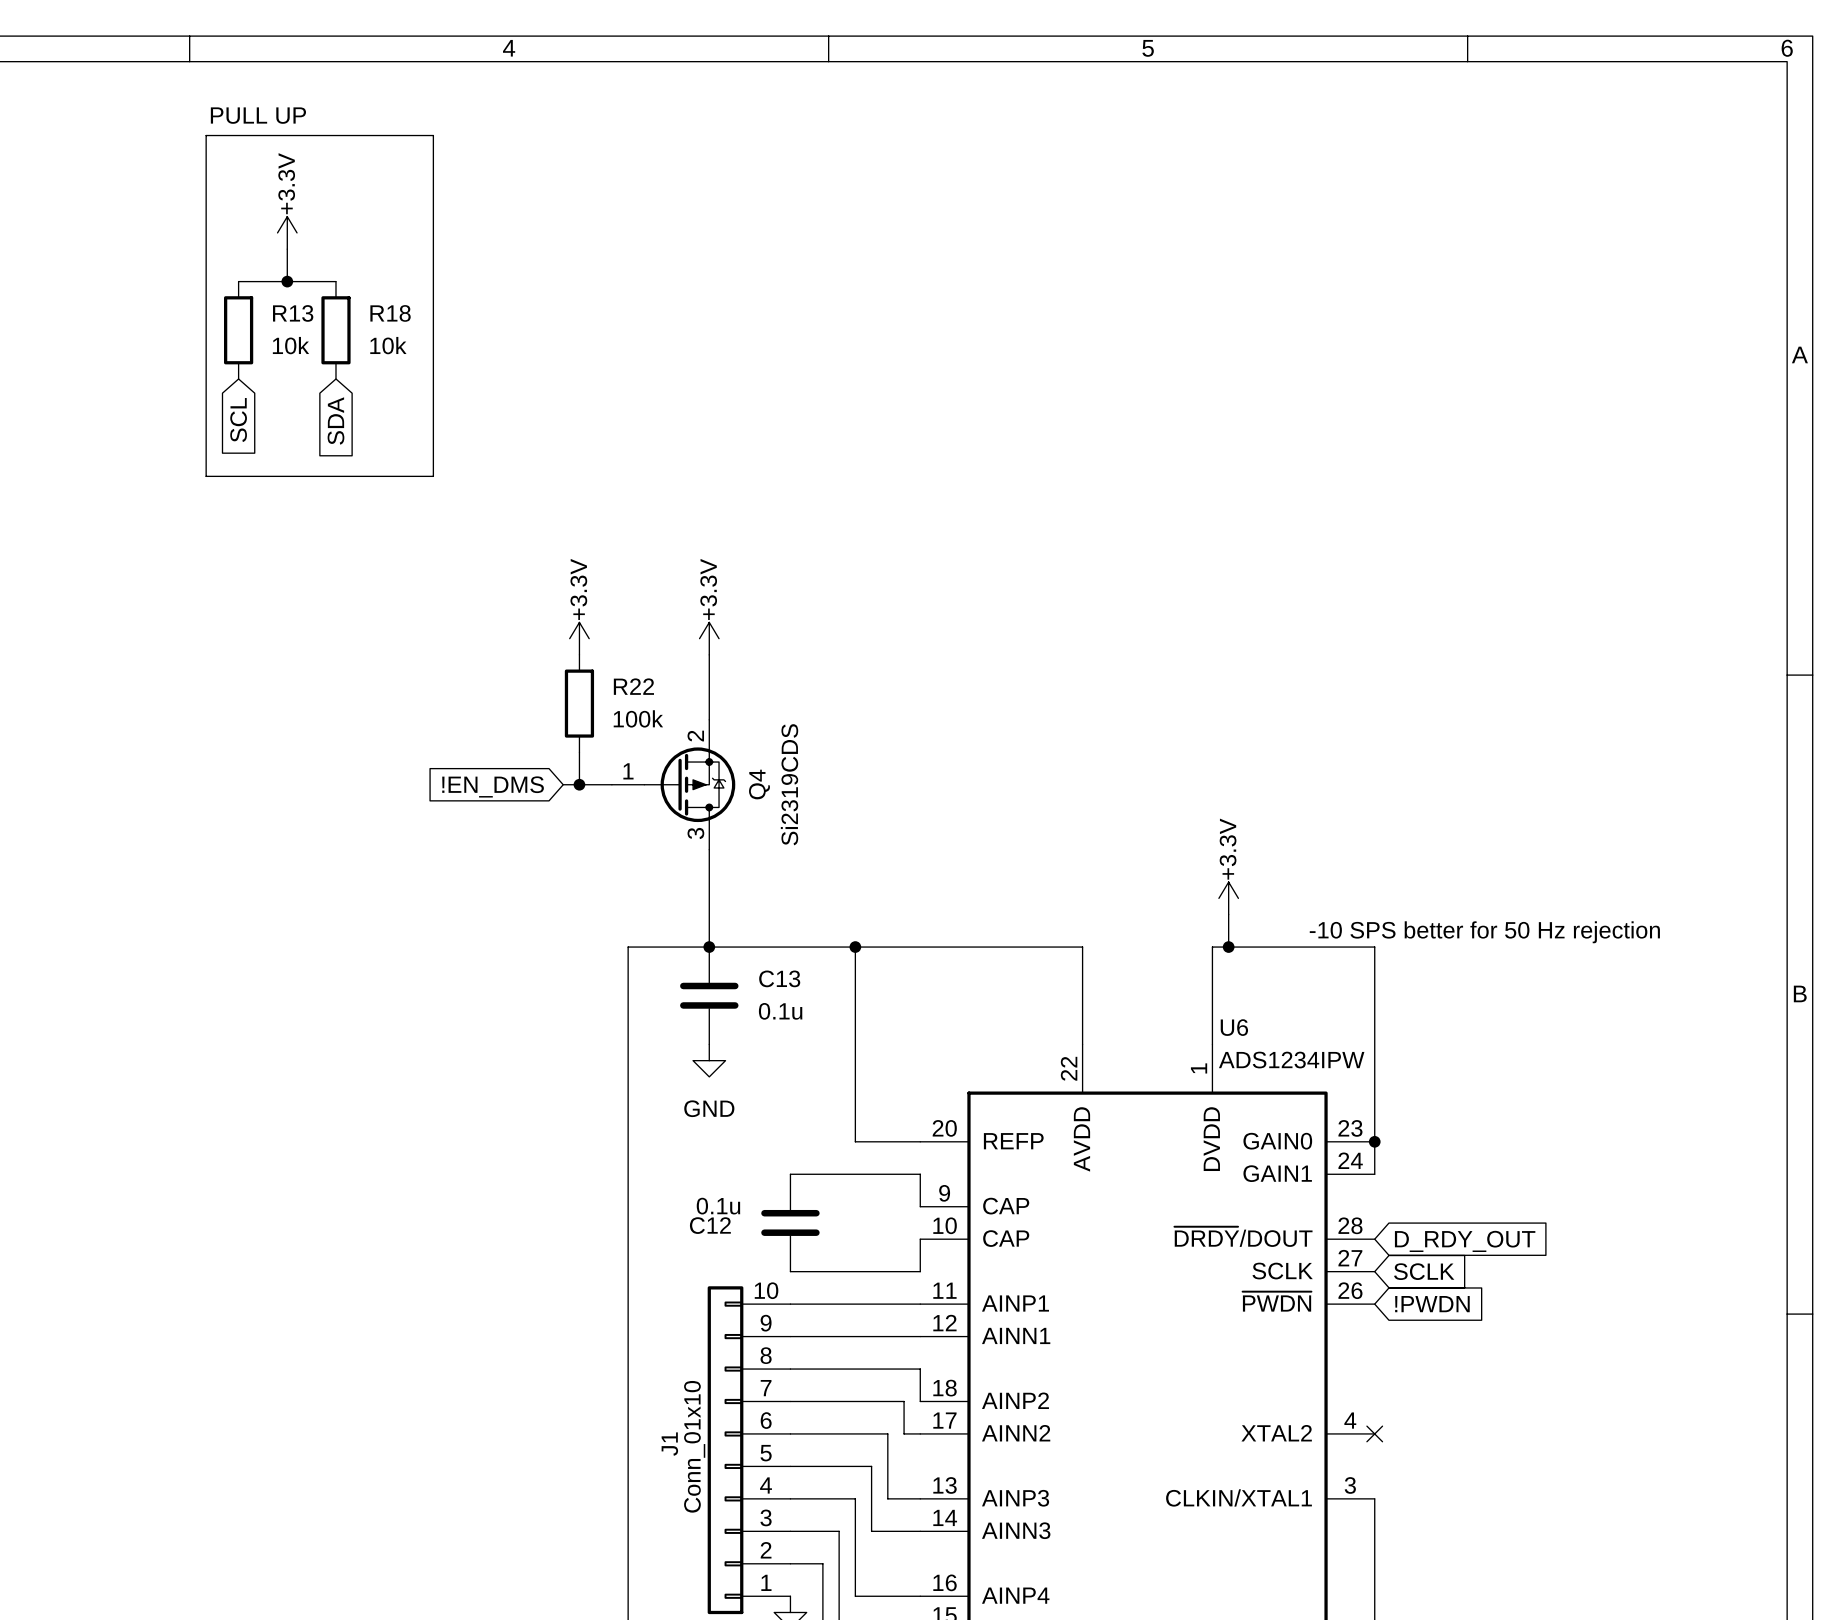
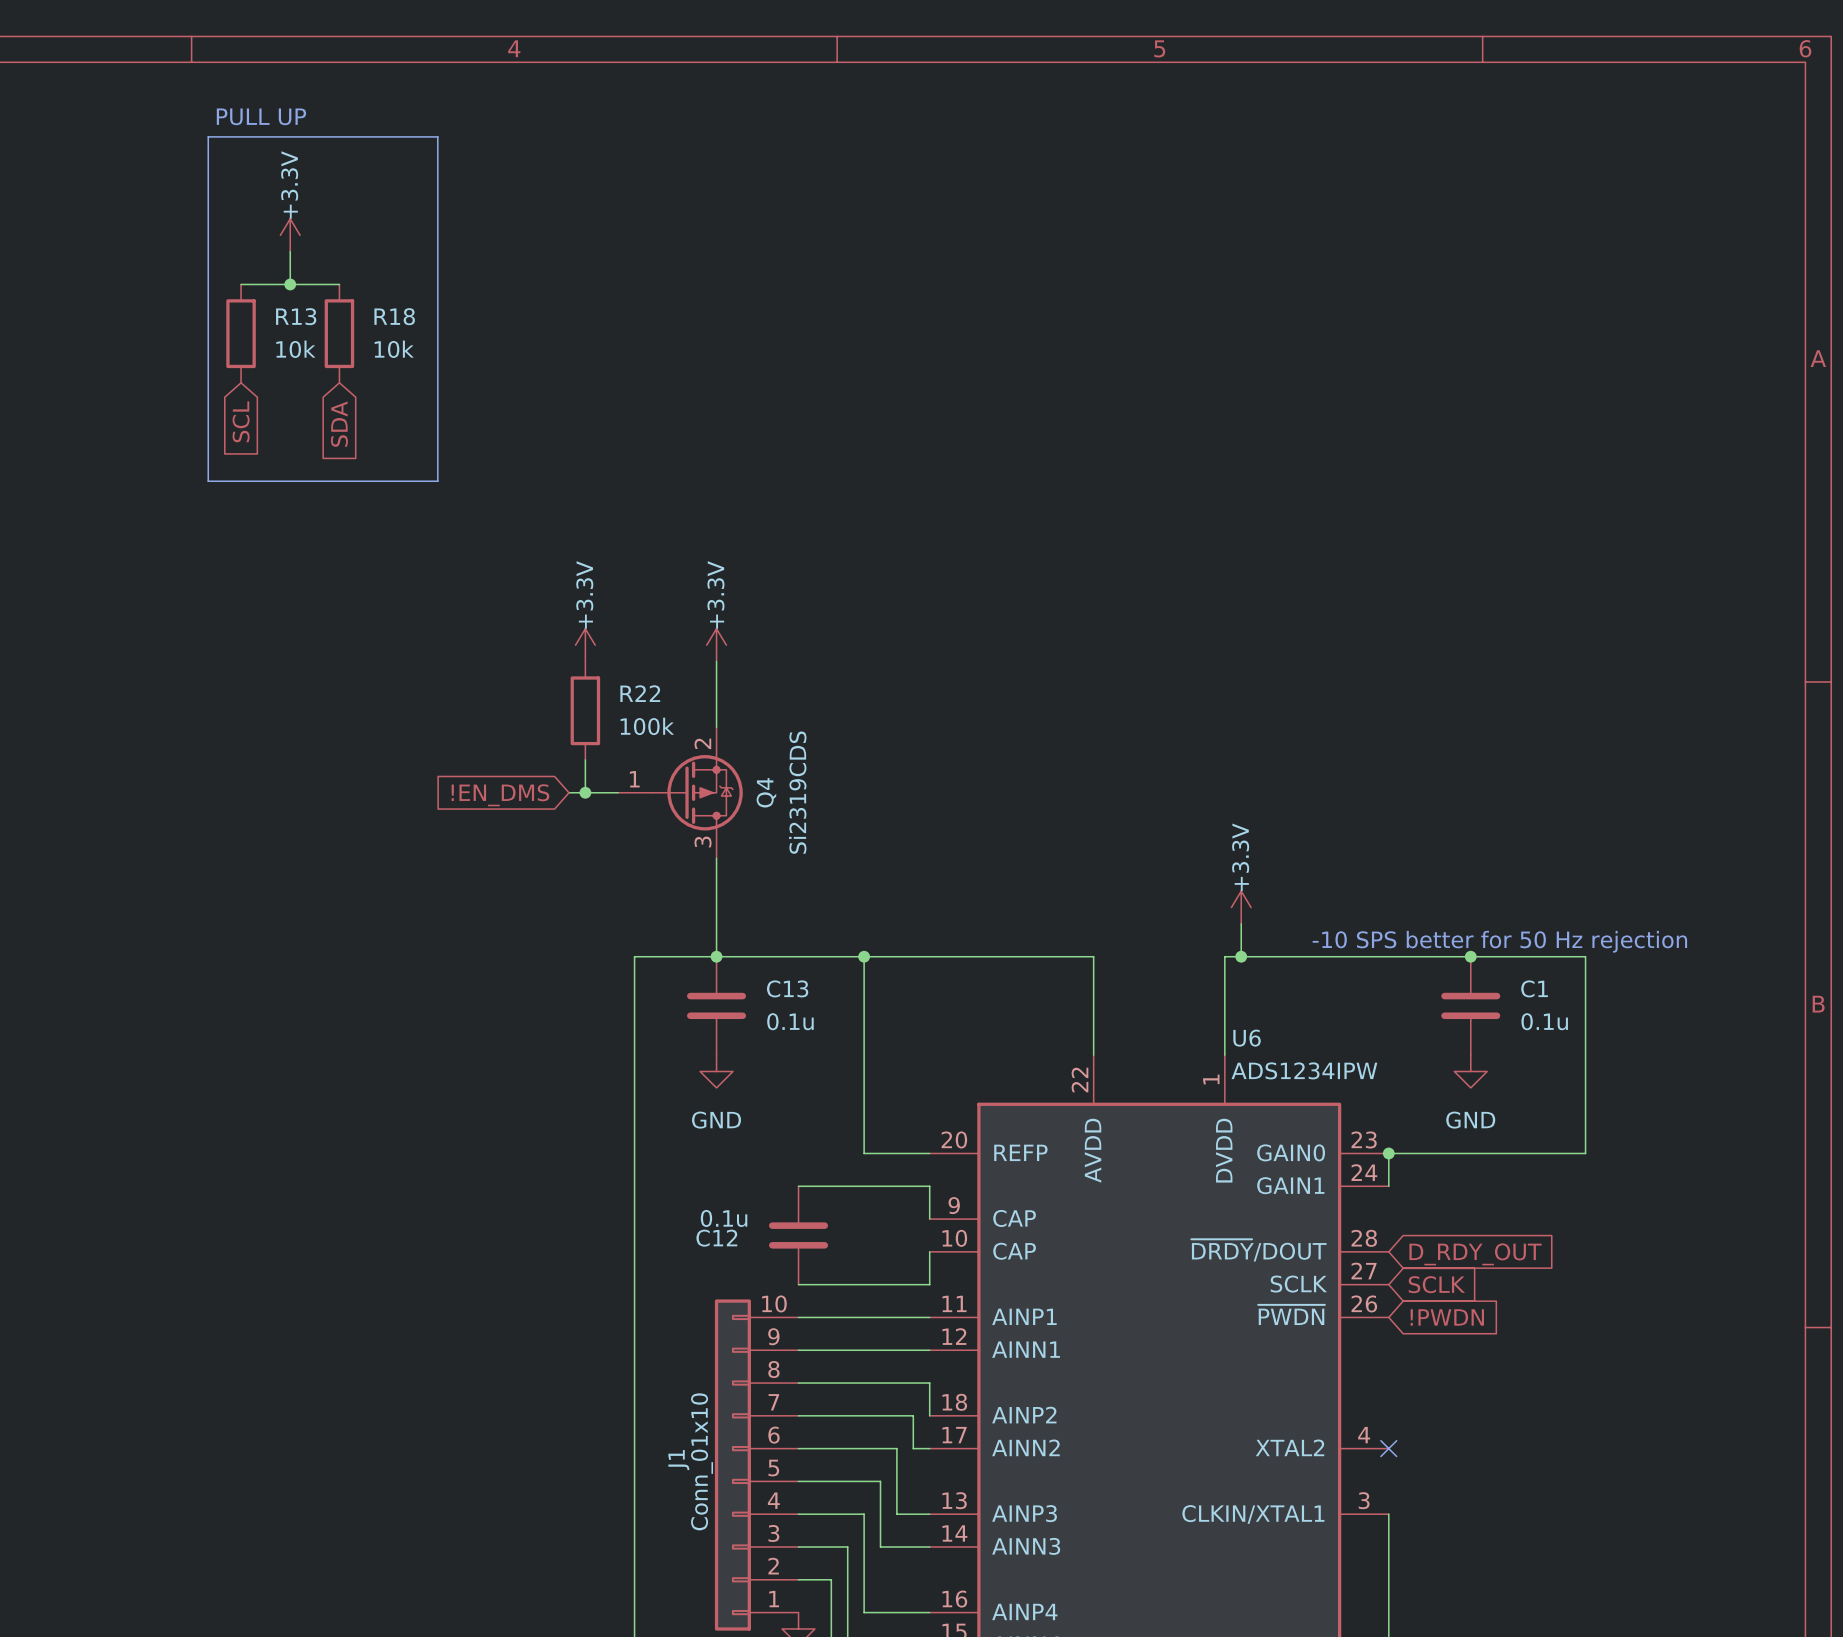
wire: (1374, 947) (1374, 1141) -> (1388, 956) (1585, 956) (1585, 1153) (1388, 1153)
junction: none -> (1470, 956)
C1: none -> 0.1u (1470, 1005)
power symbol: none -> GND (1470, 1071)

